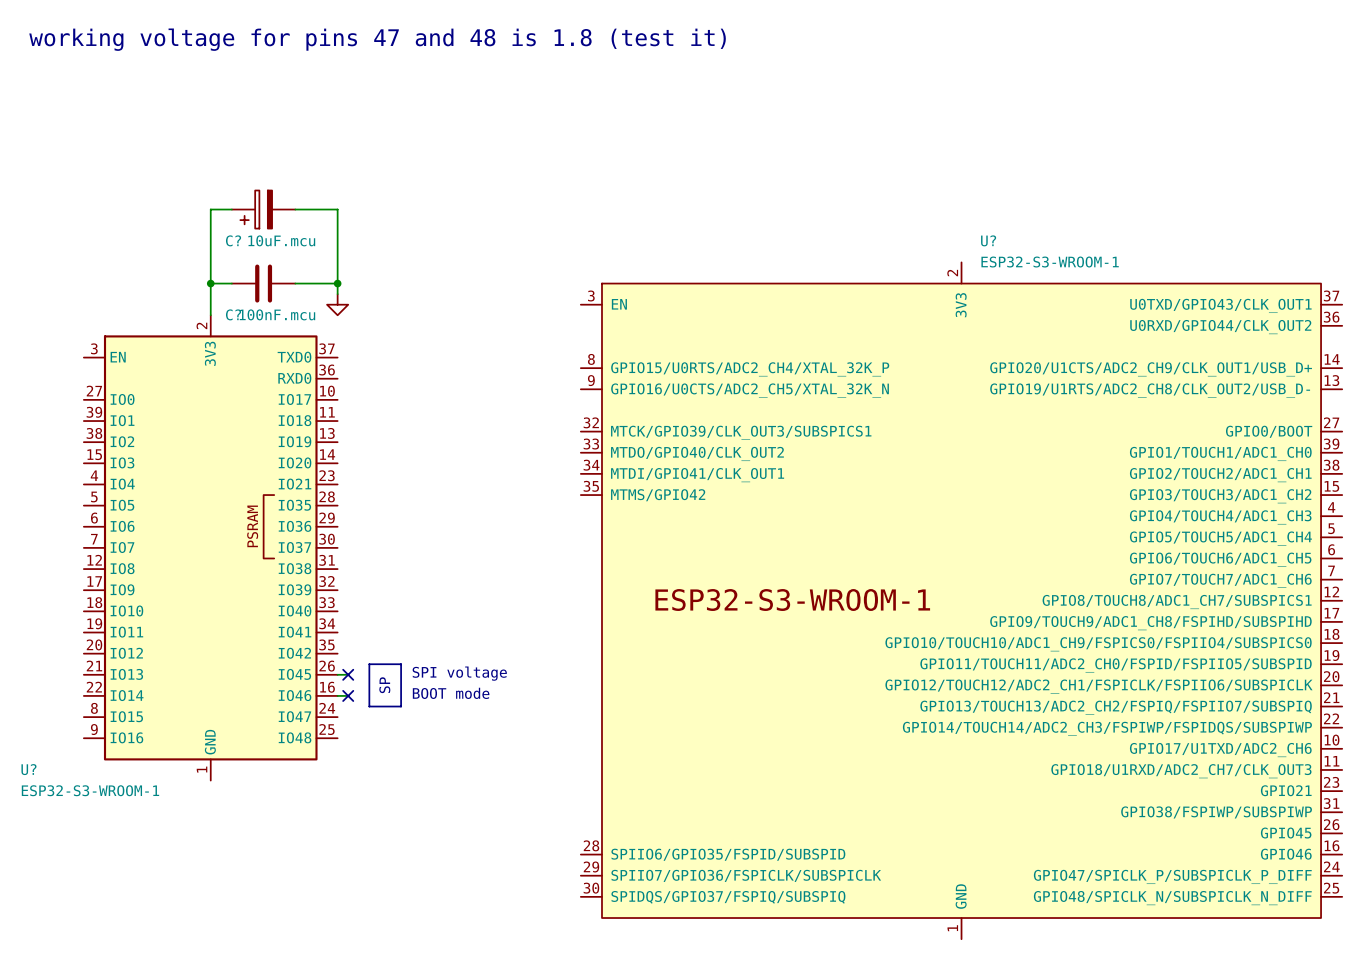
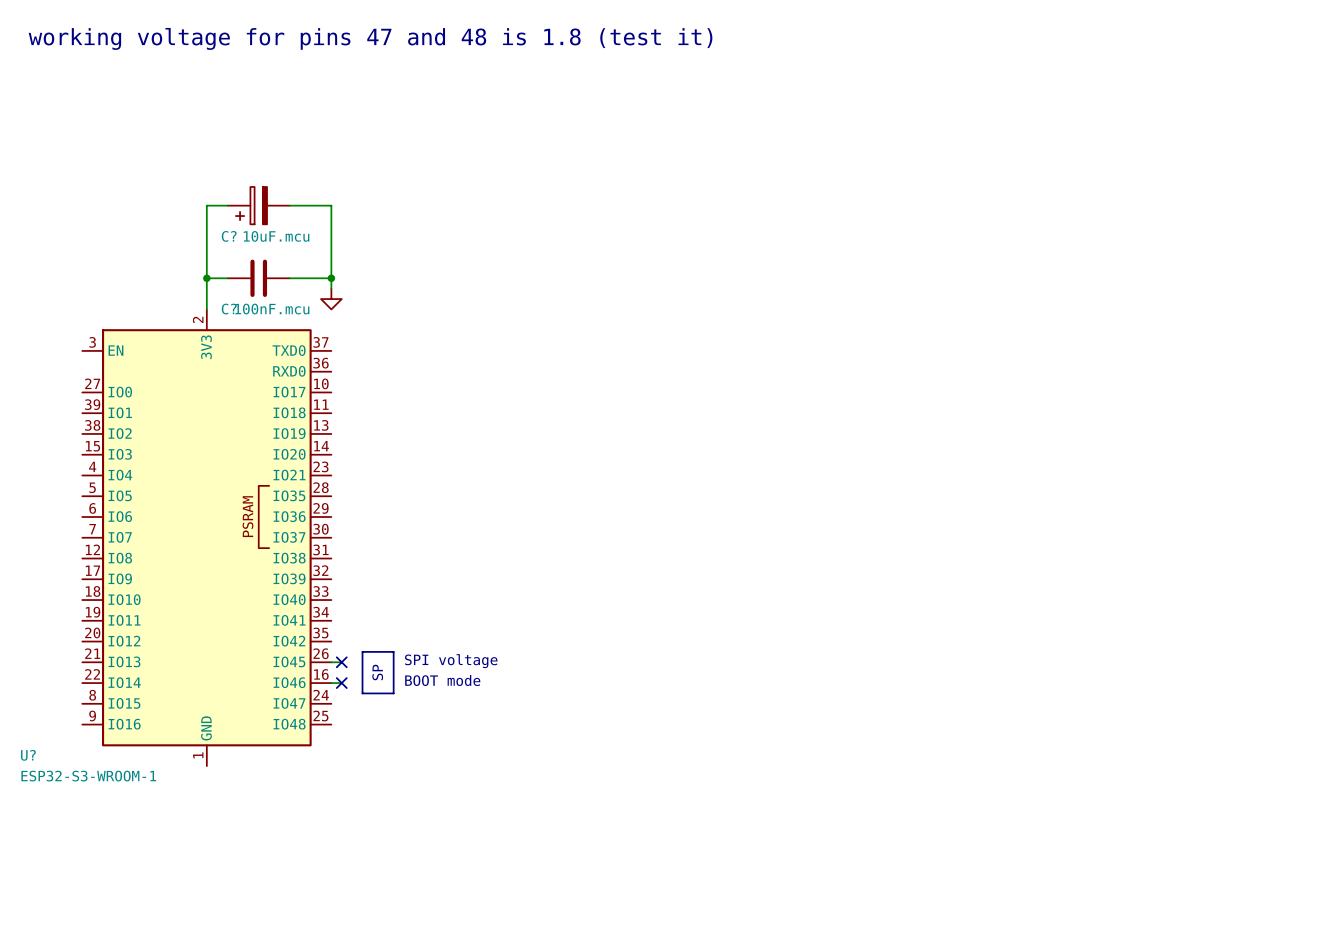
U?: ESP32-S3-WROOM-1 (961, 600) -> none

